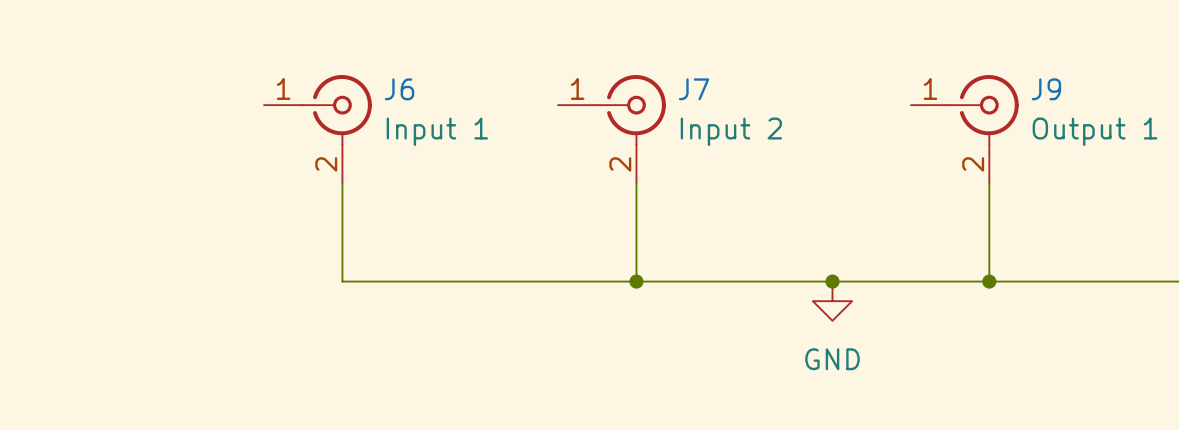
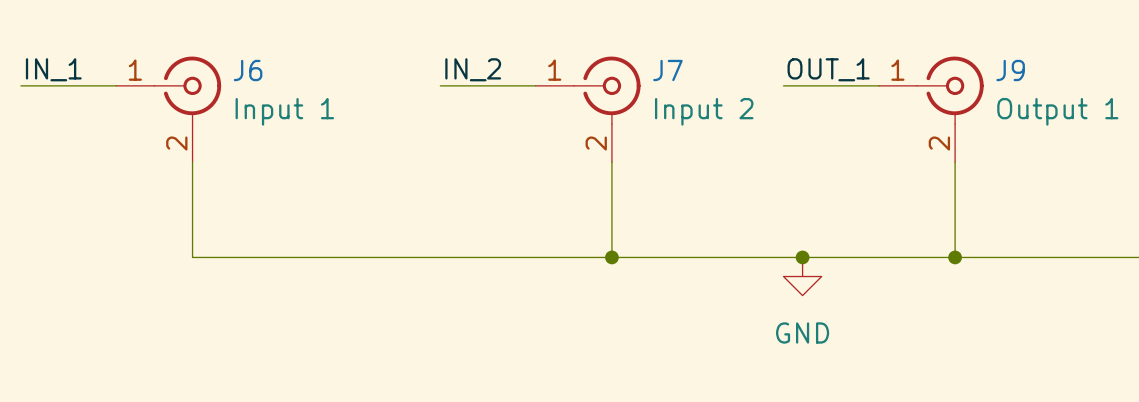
label: none -> IN_1 (53, 69)
label: none -> IN_2 (473, 69)
label: none -> OUT_1 (828, 69)
wire: none -> (20, 85) (116, 85)
wire: none -> (440, 85) (535, 85)
wire: none -> (783, 85) (878, 85)
J6 position: (317, 129) -> (168, 109)
wire: (342, 183) (342, 281) -> (192, 162) (192, 257) (325, 257)

